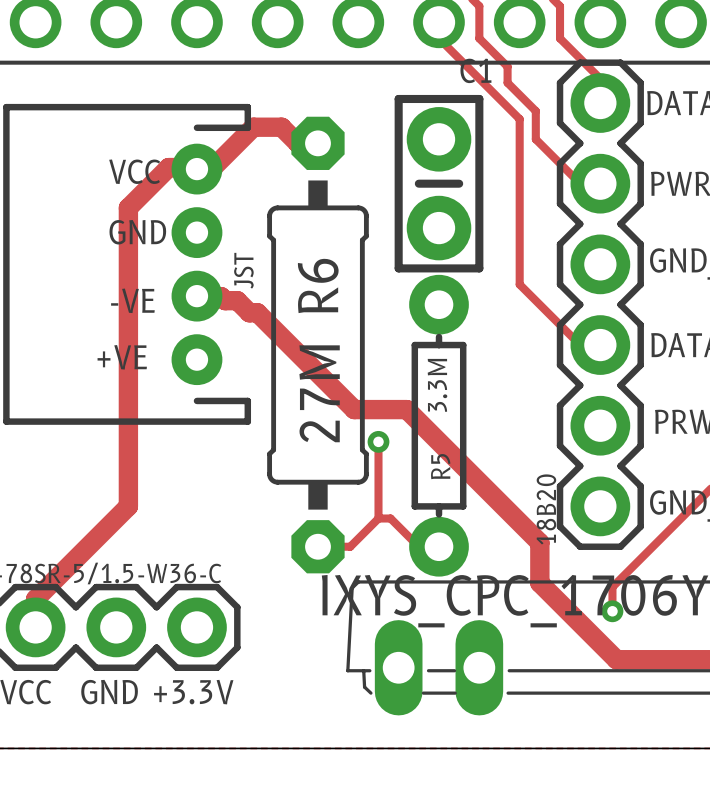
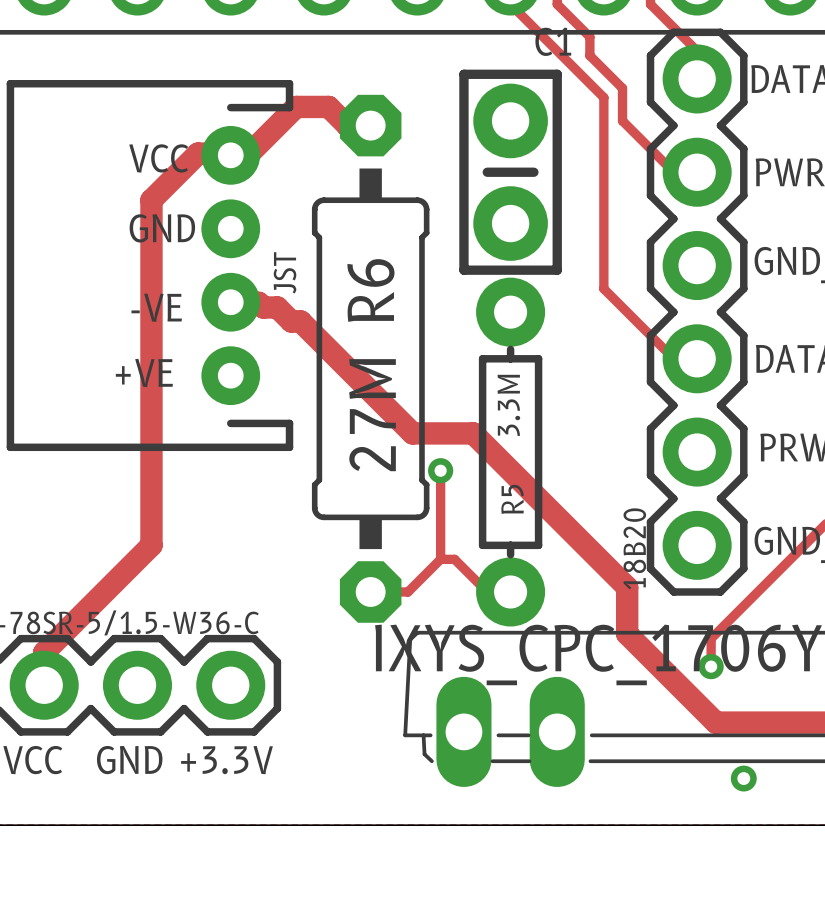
via: none -> (743, 778)

